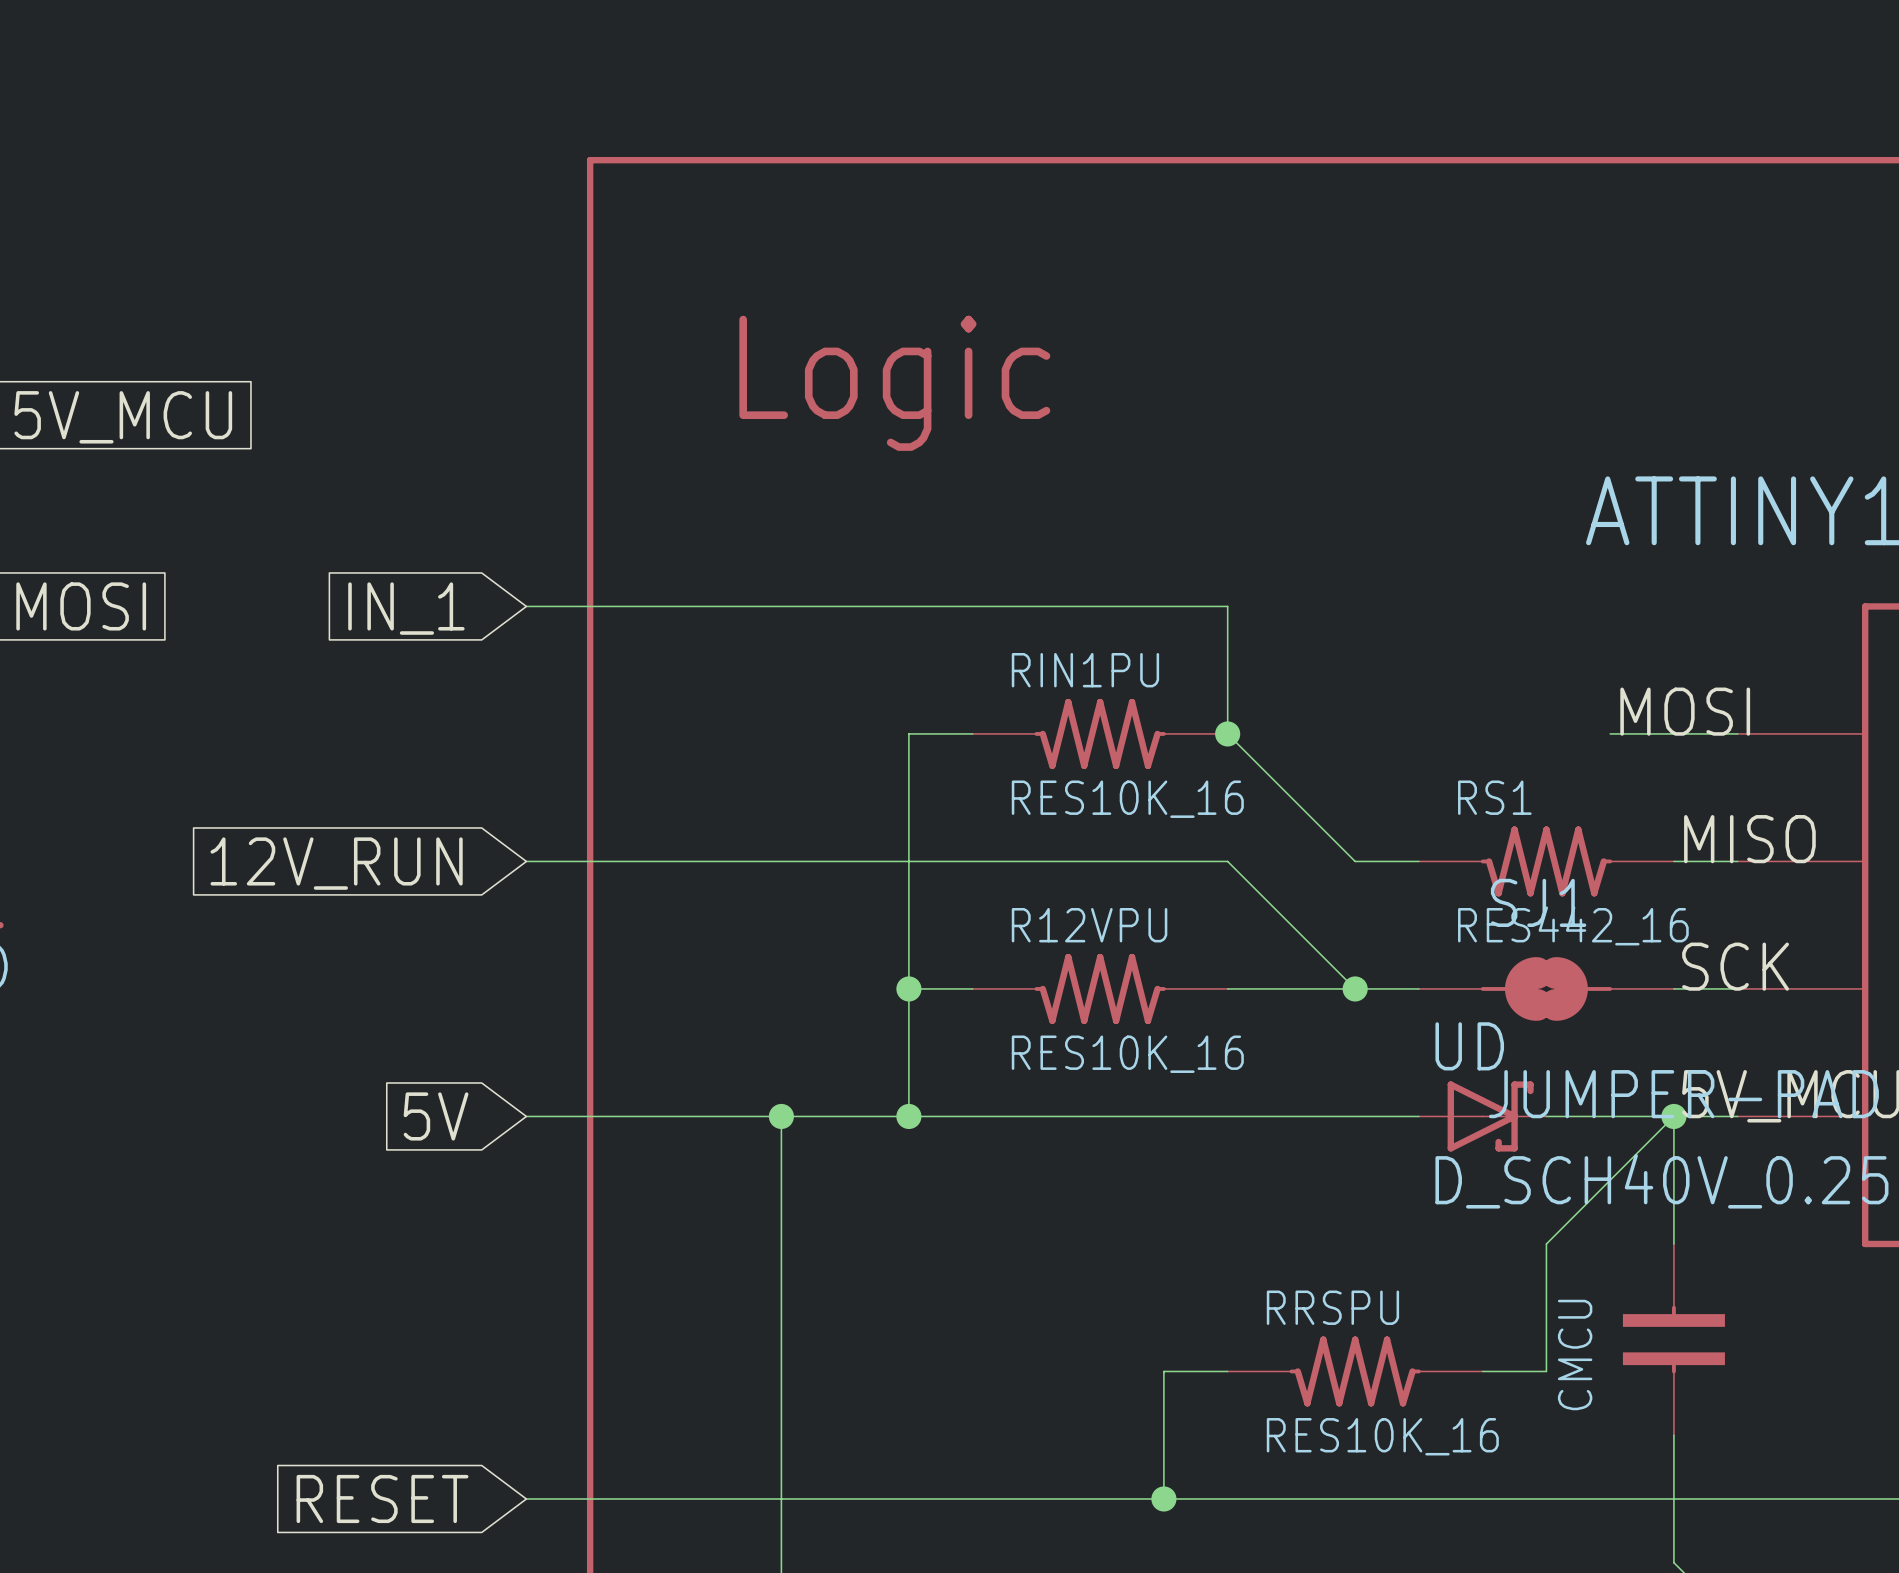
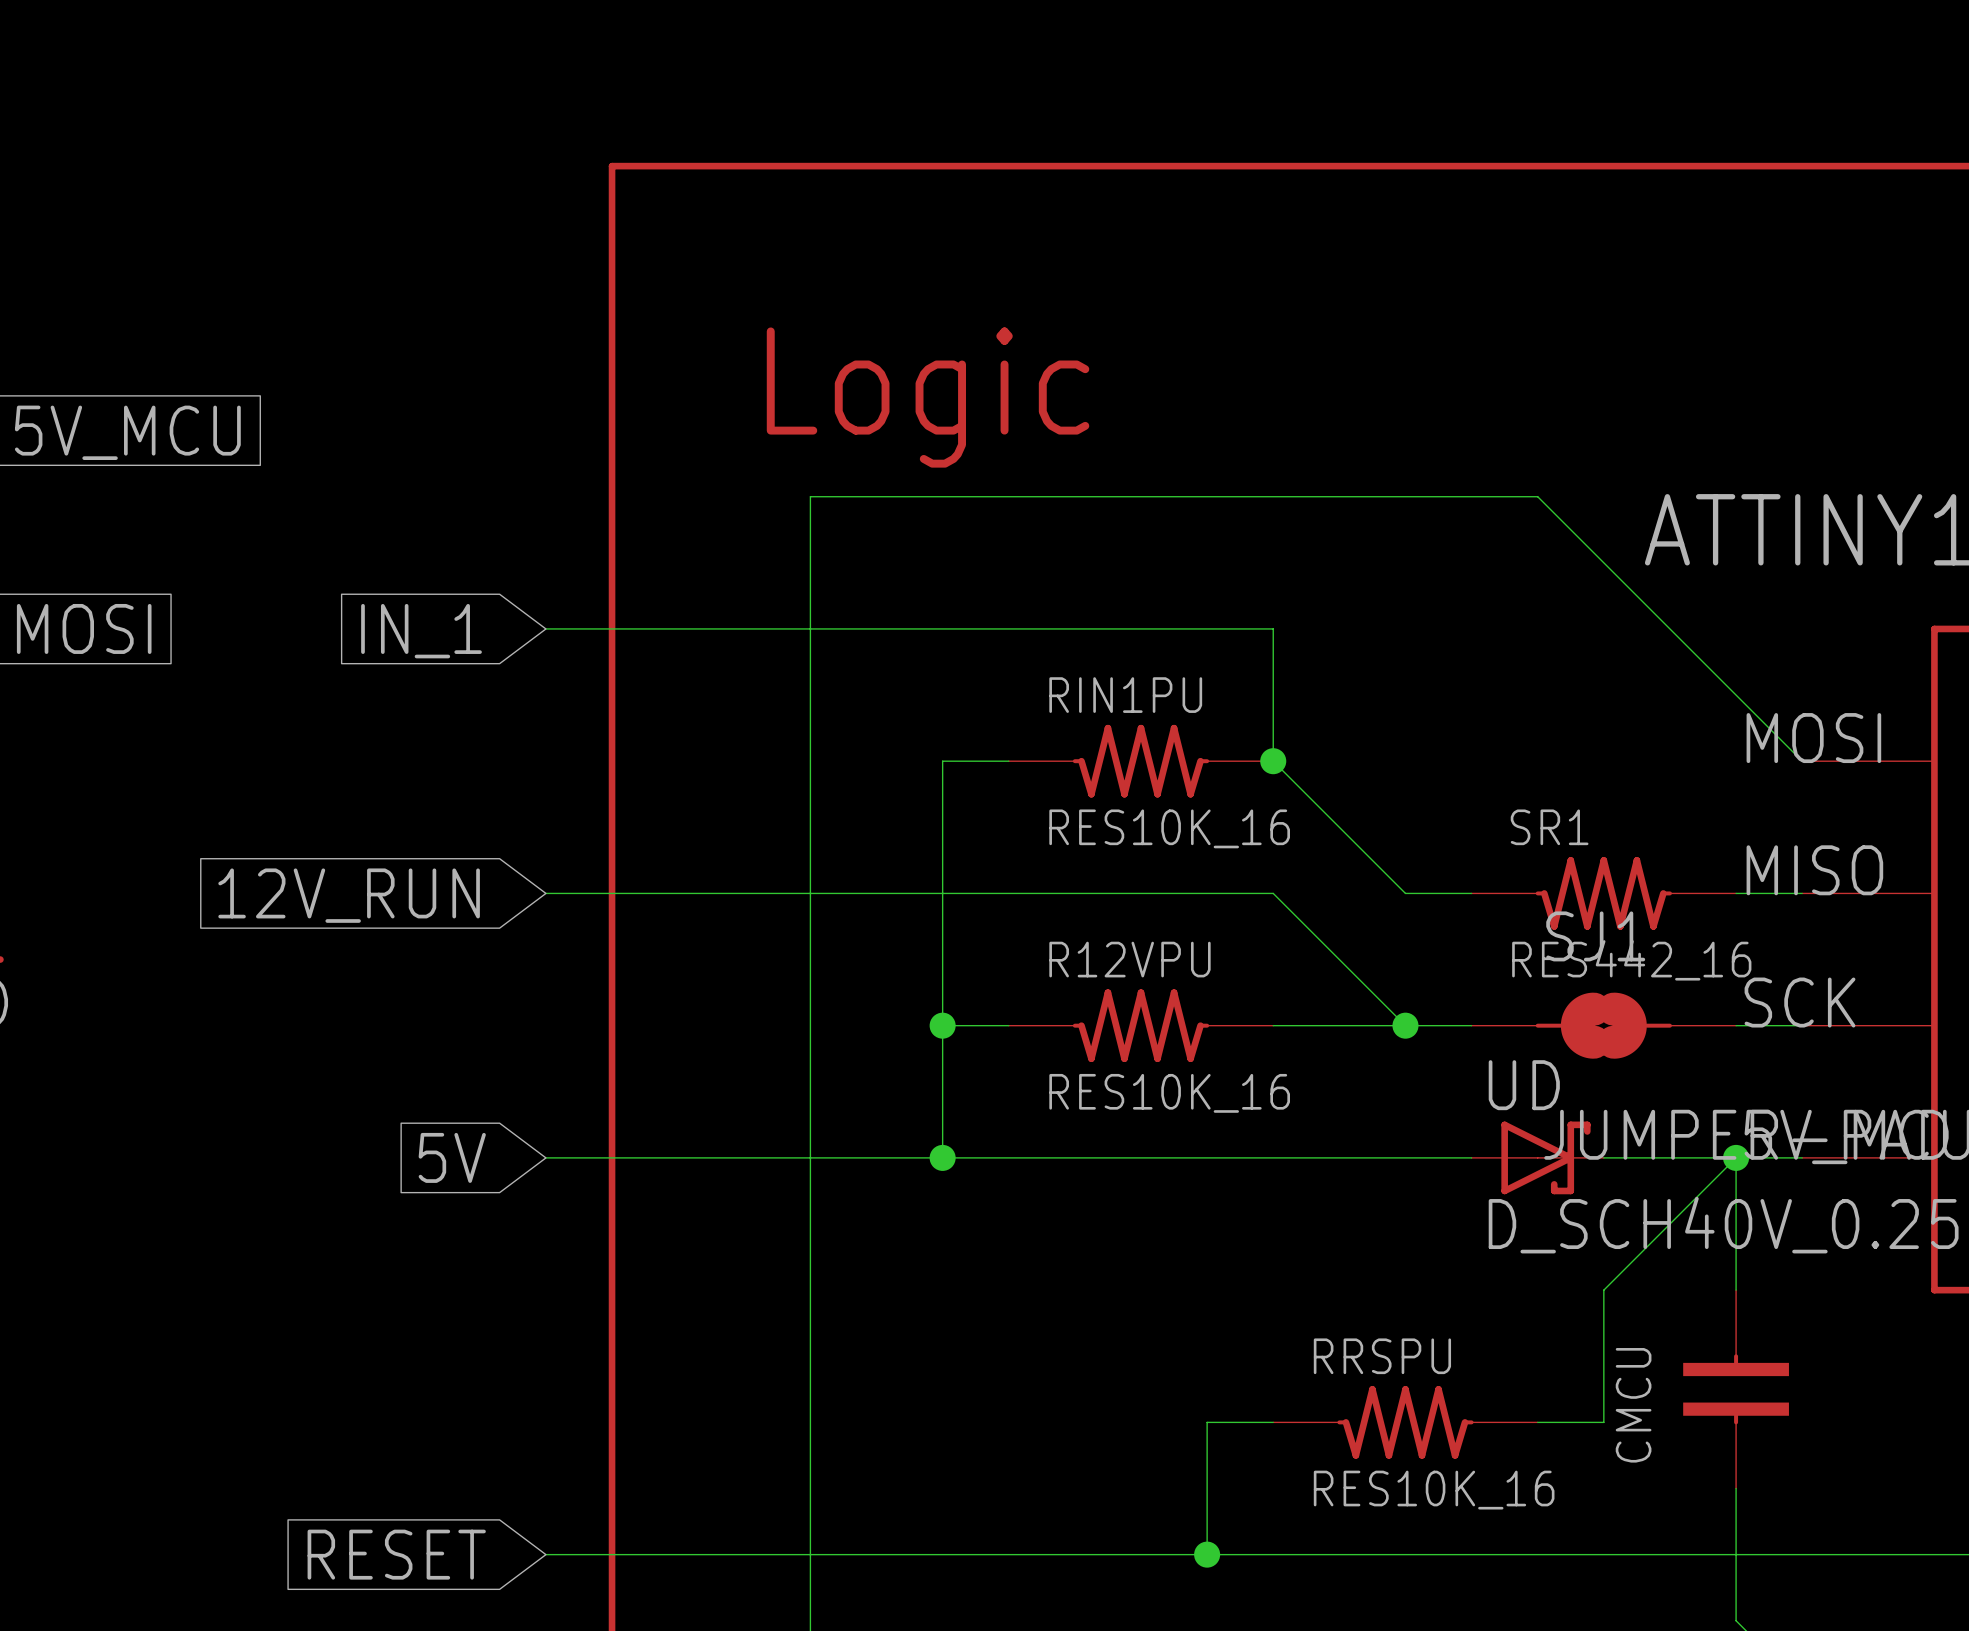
label position: MOSI (1685, 711) -> MOSI (1813, 738)
wire: (1610, 733) (1737, 733) -> (810, 1157) (810, 496) (1537, 496) (1802, 761)
RS1 name: RS1 (1494, 797) -> SR1 (1549, 827)
junction: (781, 1116) -> none

